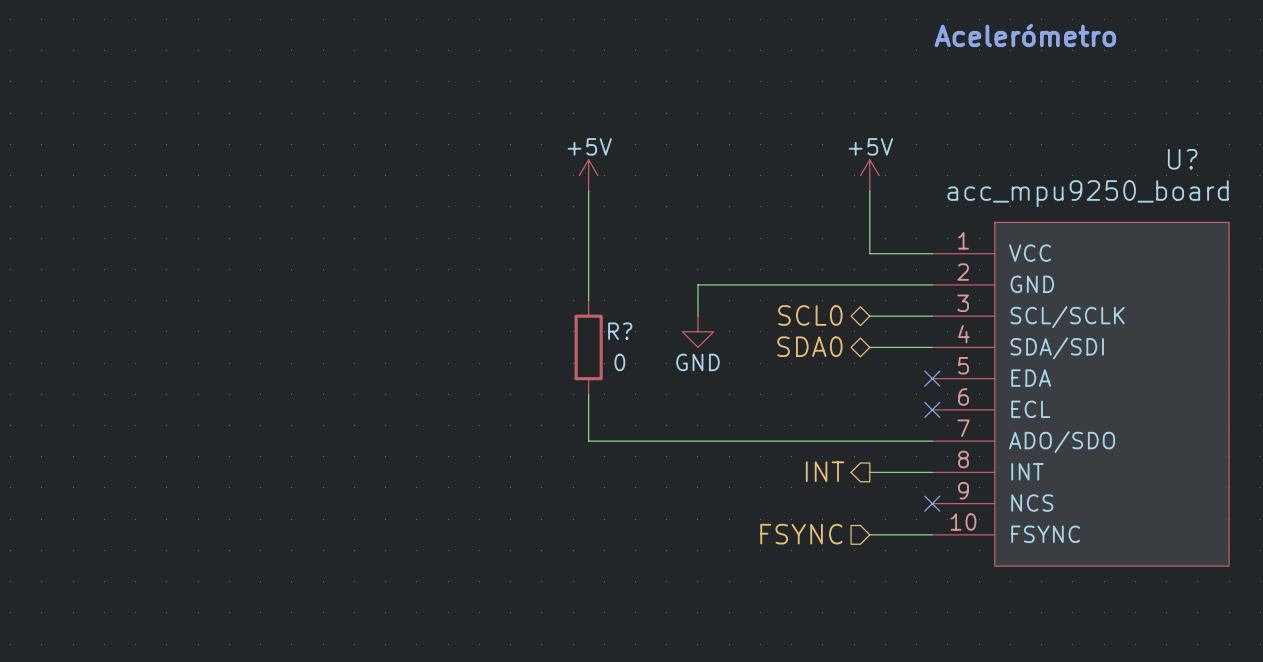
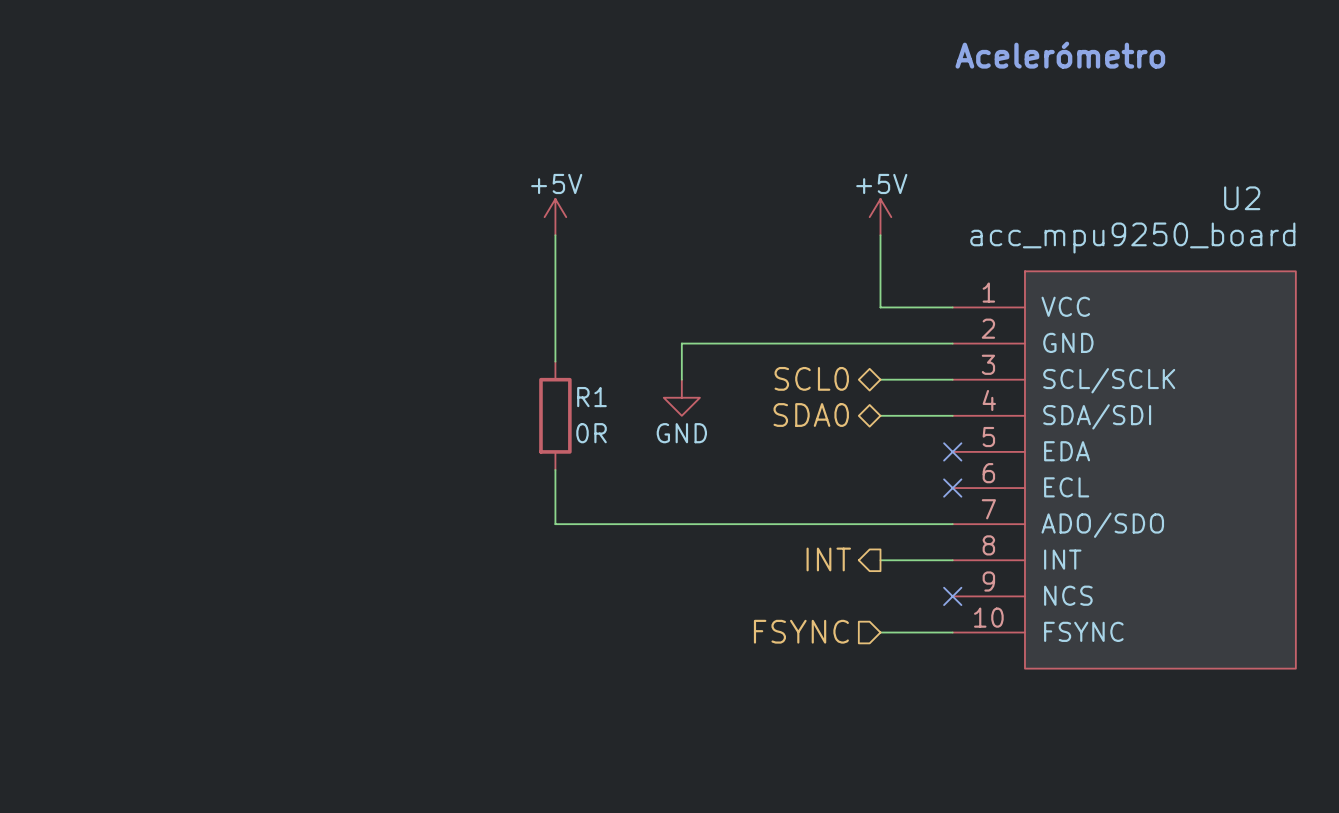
U? name: U? (1182, 159) -> U2 (1242, 198)
R? name: R? (620, 331) -> R1 (591, 397)
R? value: 0 (619, 362) -> 0R (591, 433)

